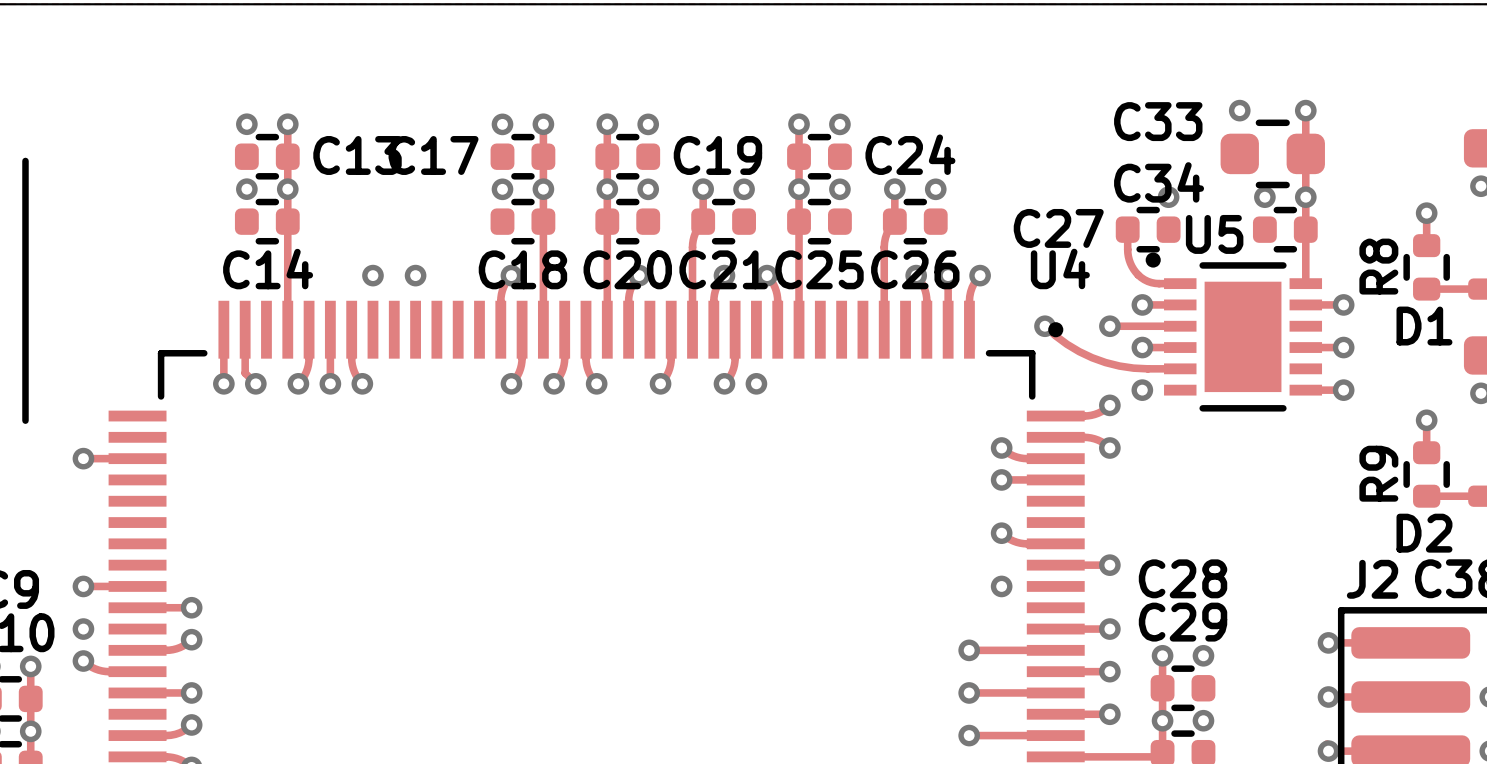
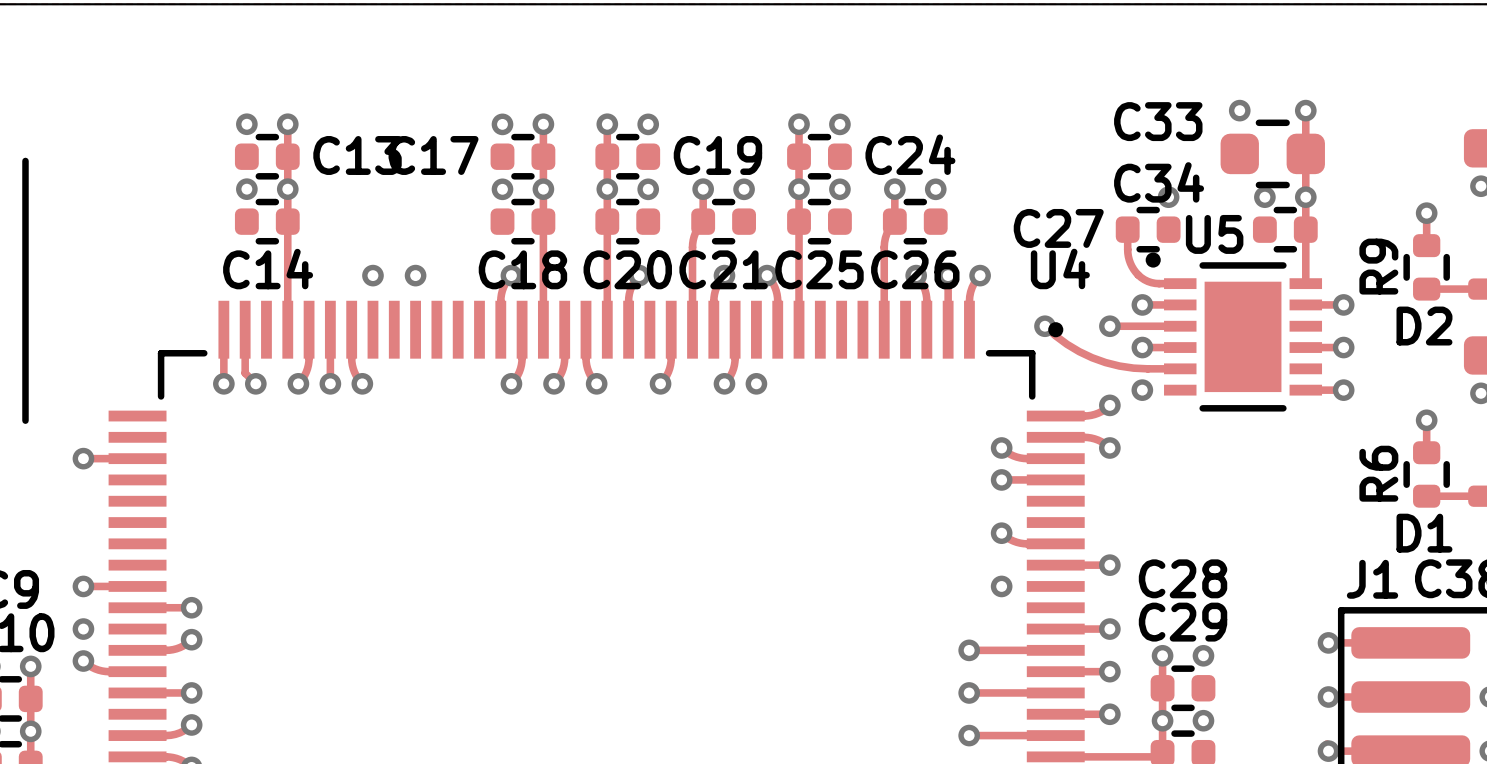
R8 name: R8 (1378, 266) -> R9 (1378, 266)
D1 name: D1 (1424, 326) -> D2 (1424, 326)
R9 name: R9 (1378, 473) -> R6 (1378, 473)
D2 name: D2 (1424, 533) -> D1 (1424, 533)
J2 name: J2 (1372, 579) -> J1 (1372, 579)

